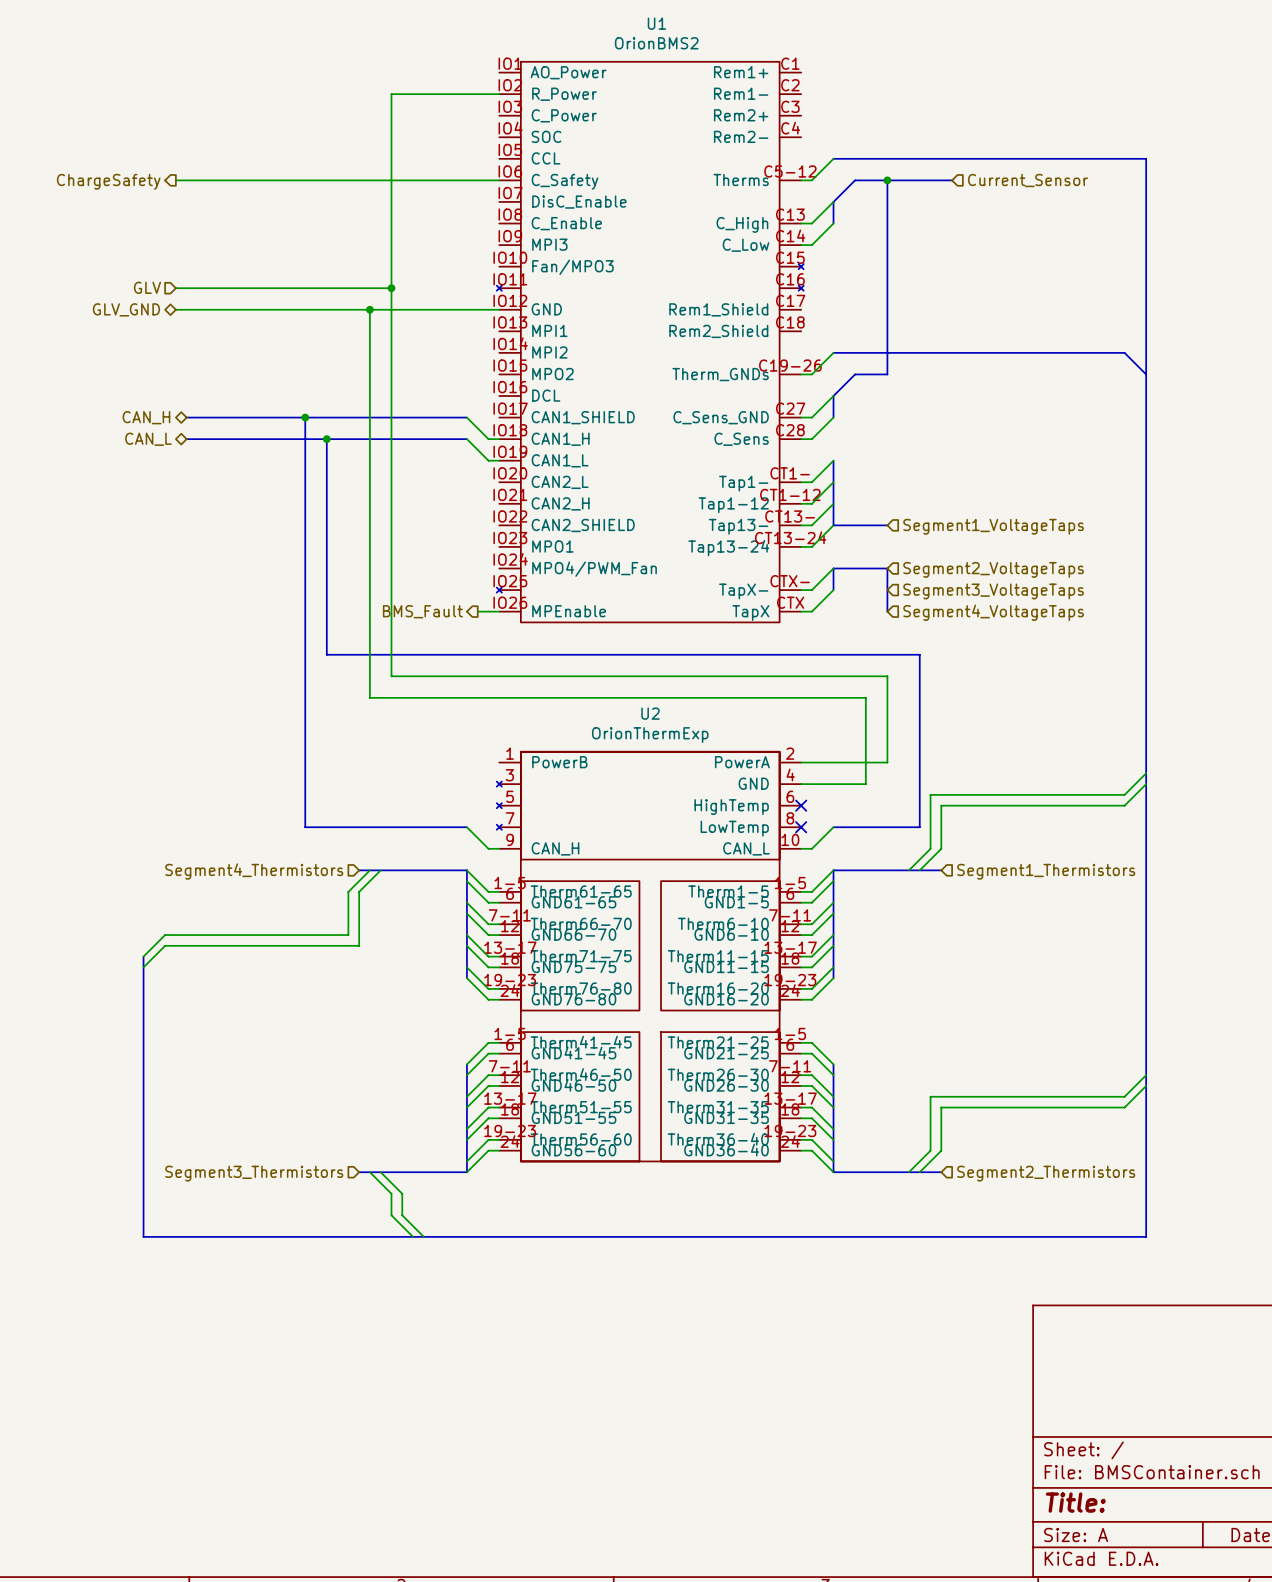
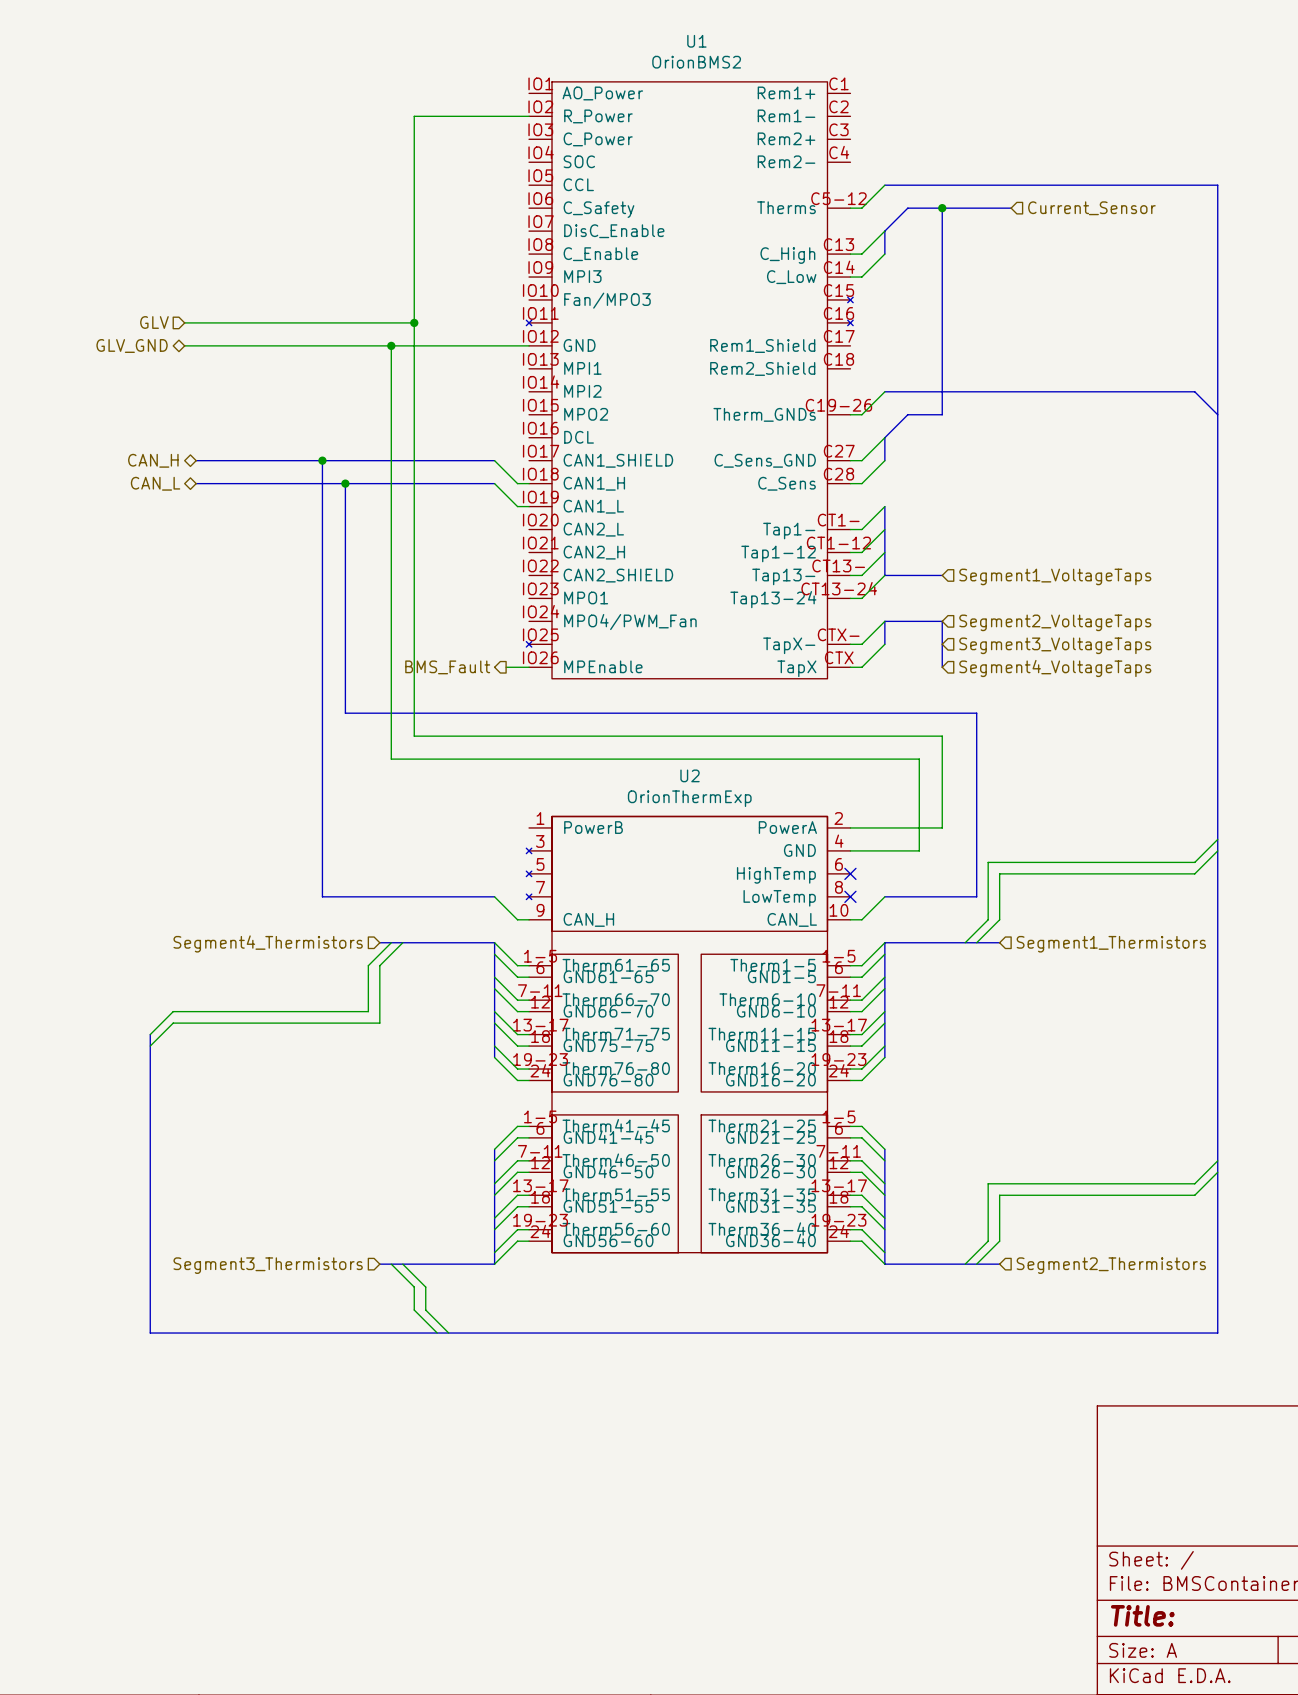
wire: (175, 180) (499, 180) -> none
hierarchical label: ChargeSafety (108, 181) -> none

